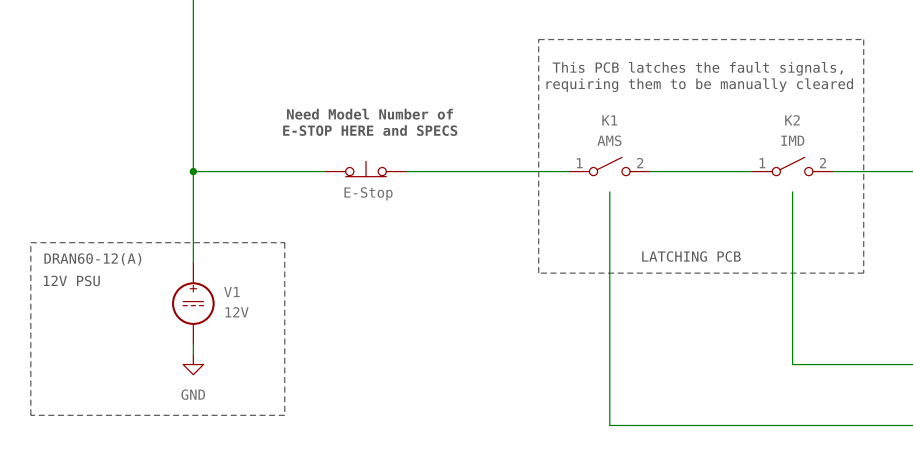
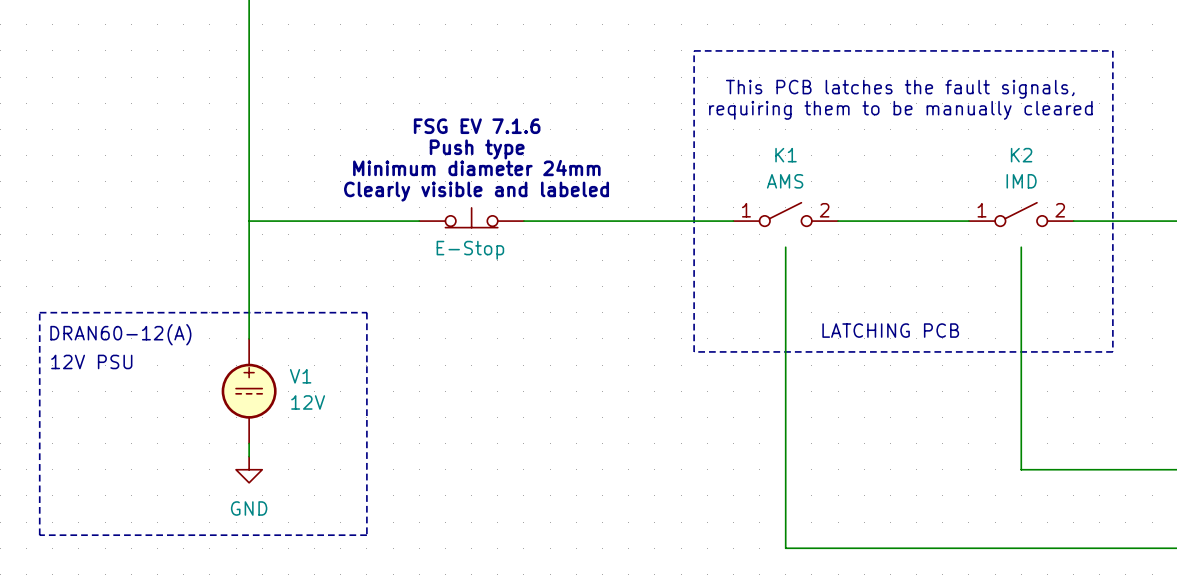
text: none -> FSG EV 7.1.6 (477, 126)
text: Need Model Number of (369, 114) -> Push type (477, 149)
text: E-STOP HERE and SPECS (370, 130) -> Minimum diameter 24mm (476, 168)
text: none -> Clearly visible and labeled (476, 191)
junction: (193, 171) -> none

